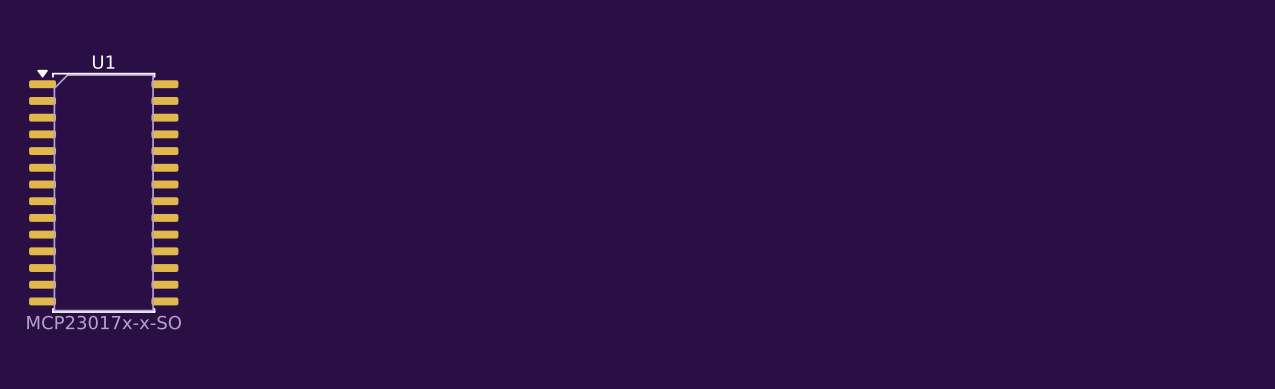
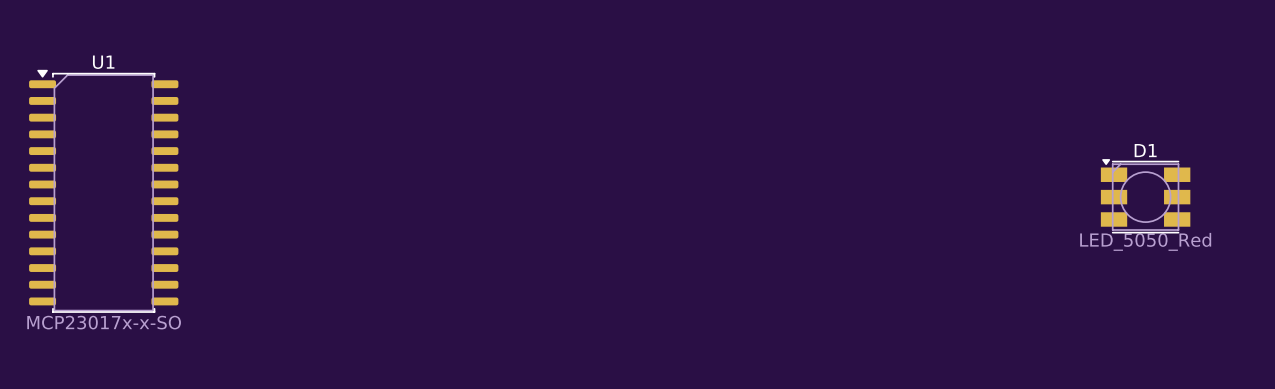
D1: none -> LED_5050_Red (1145, 196)

